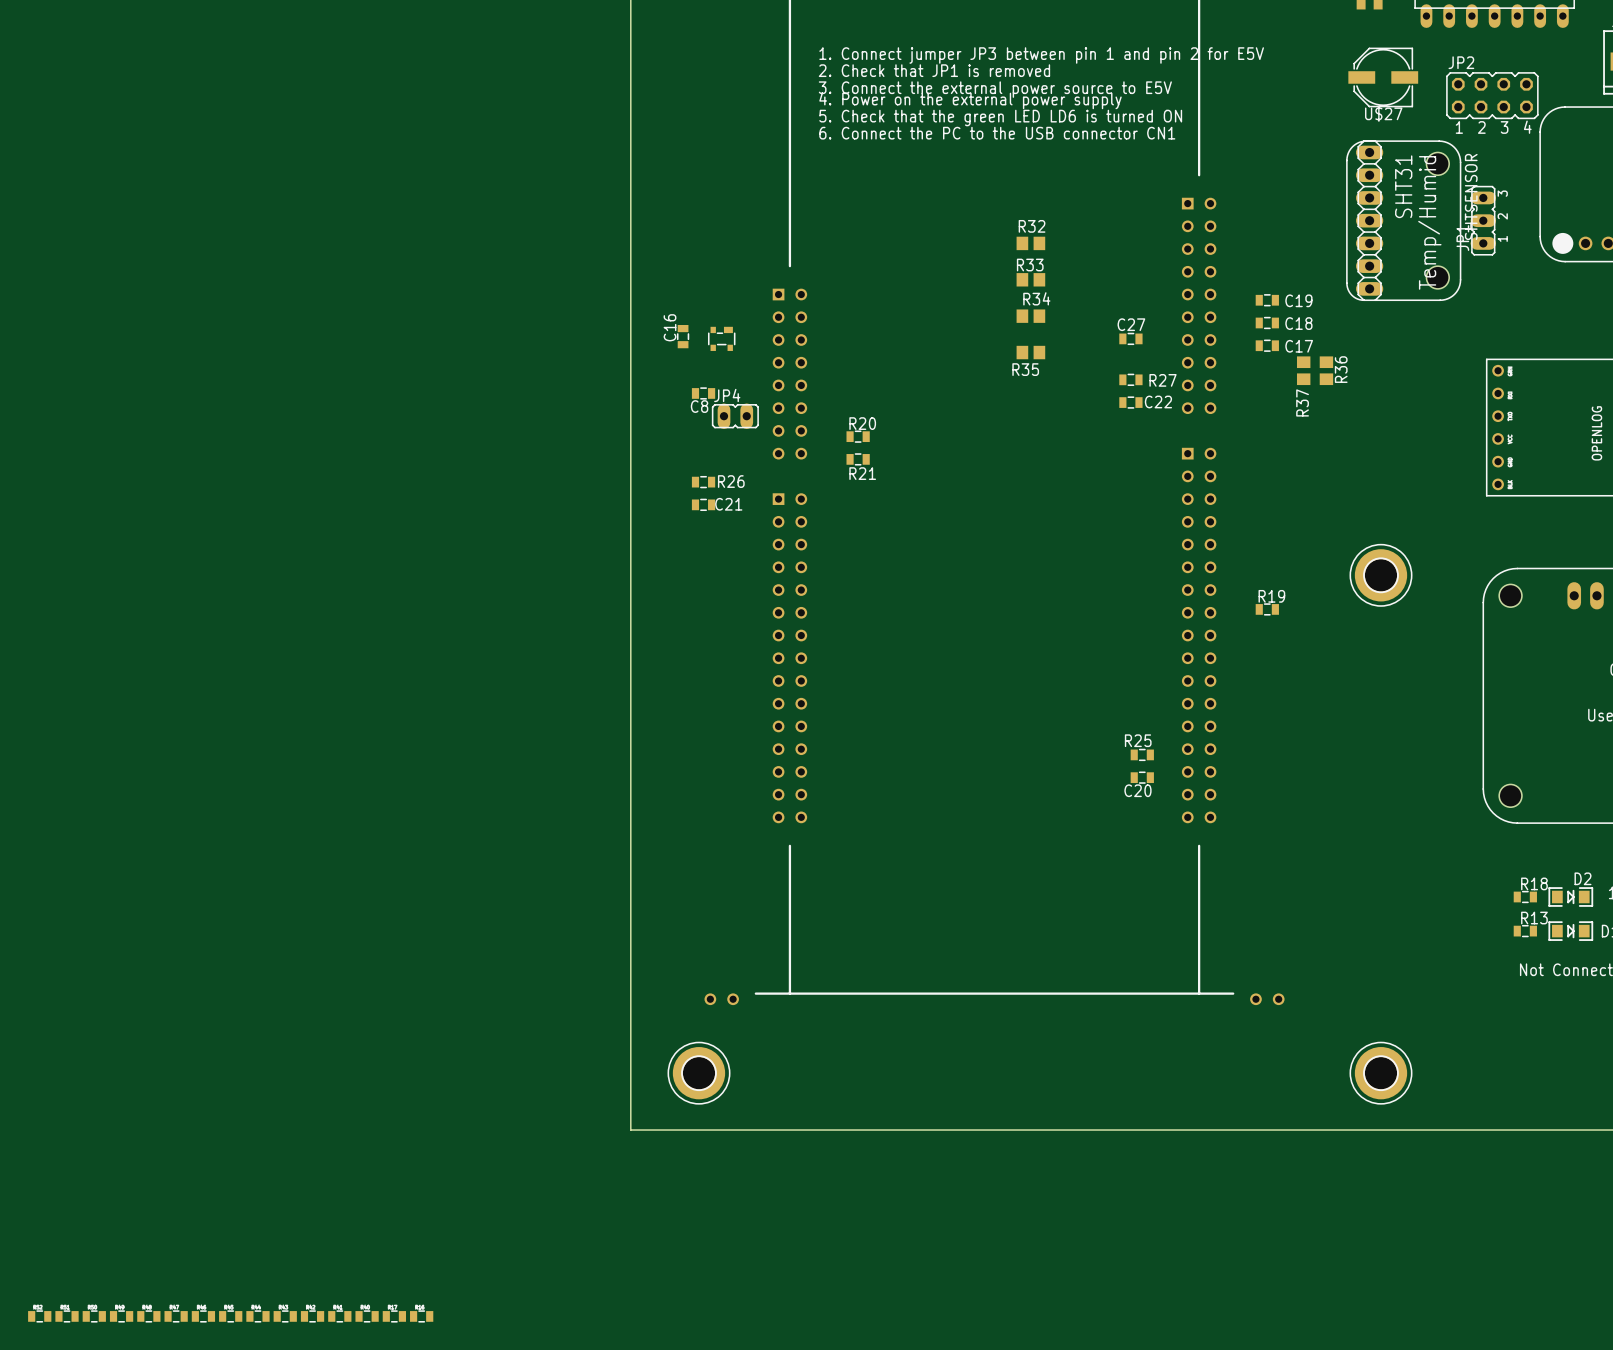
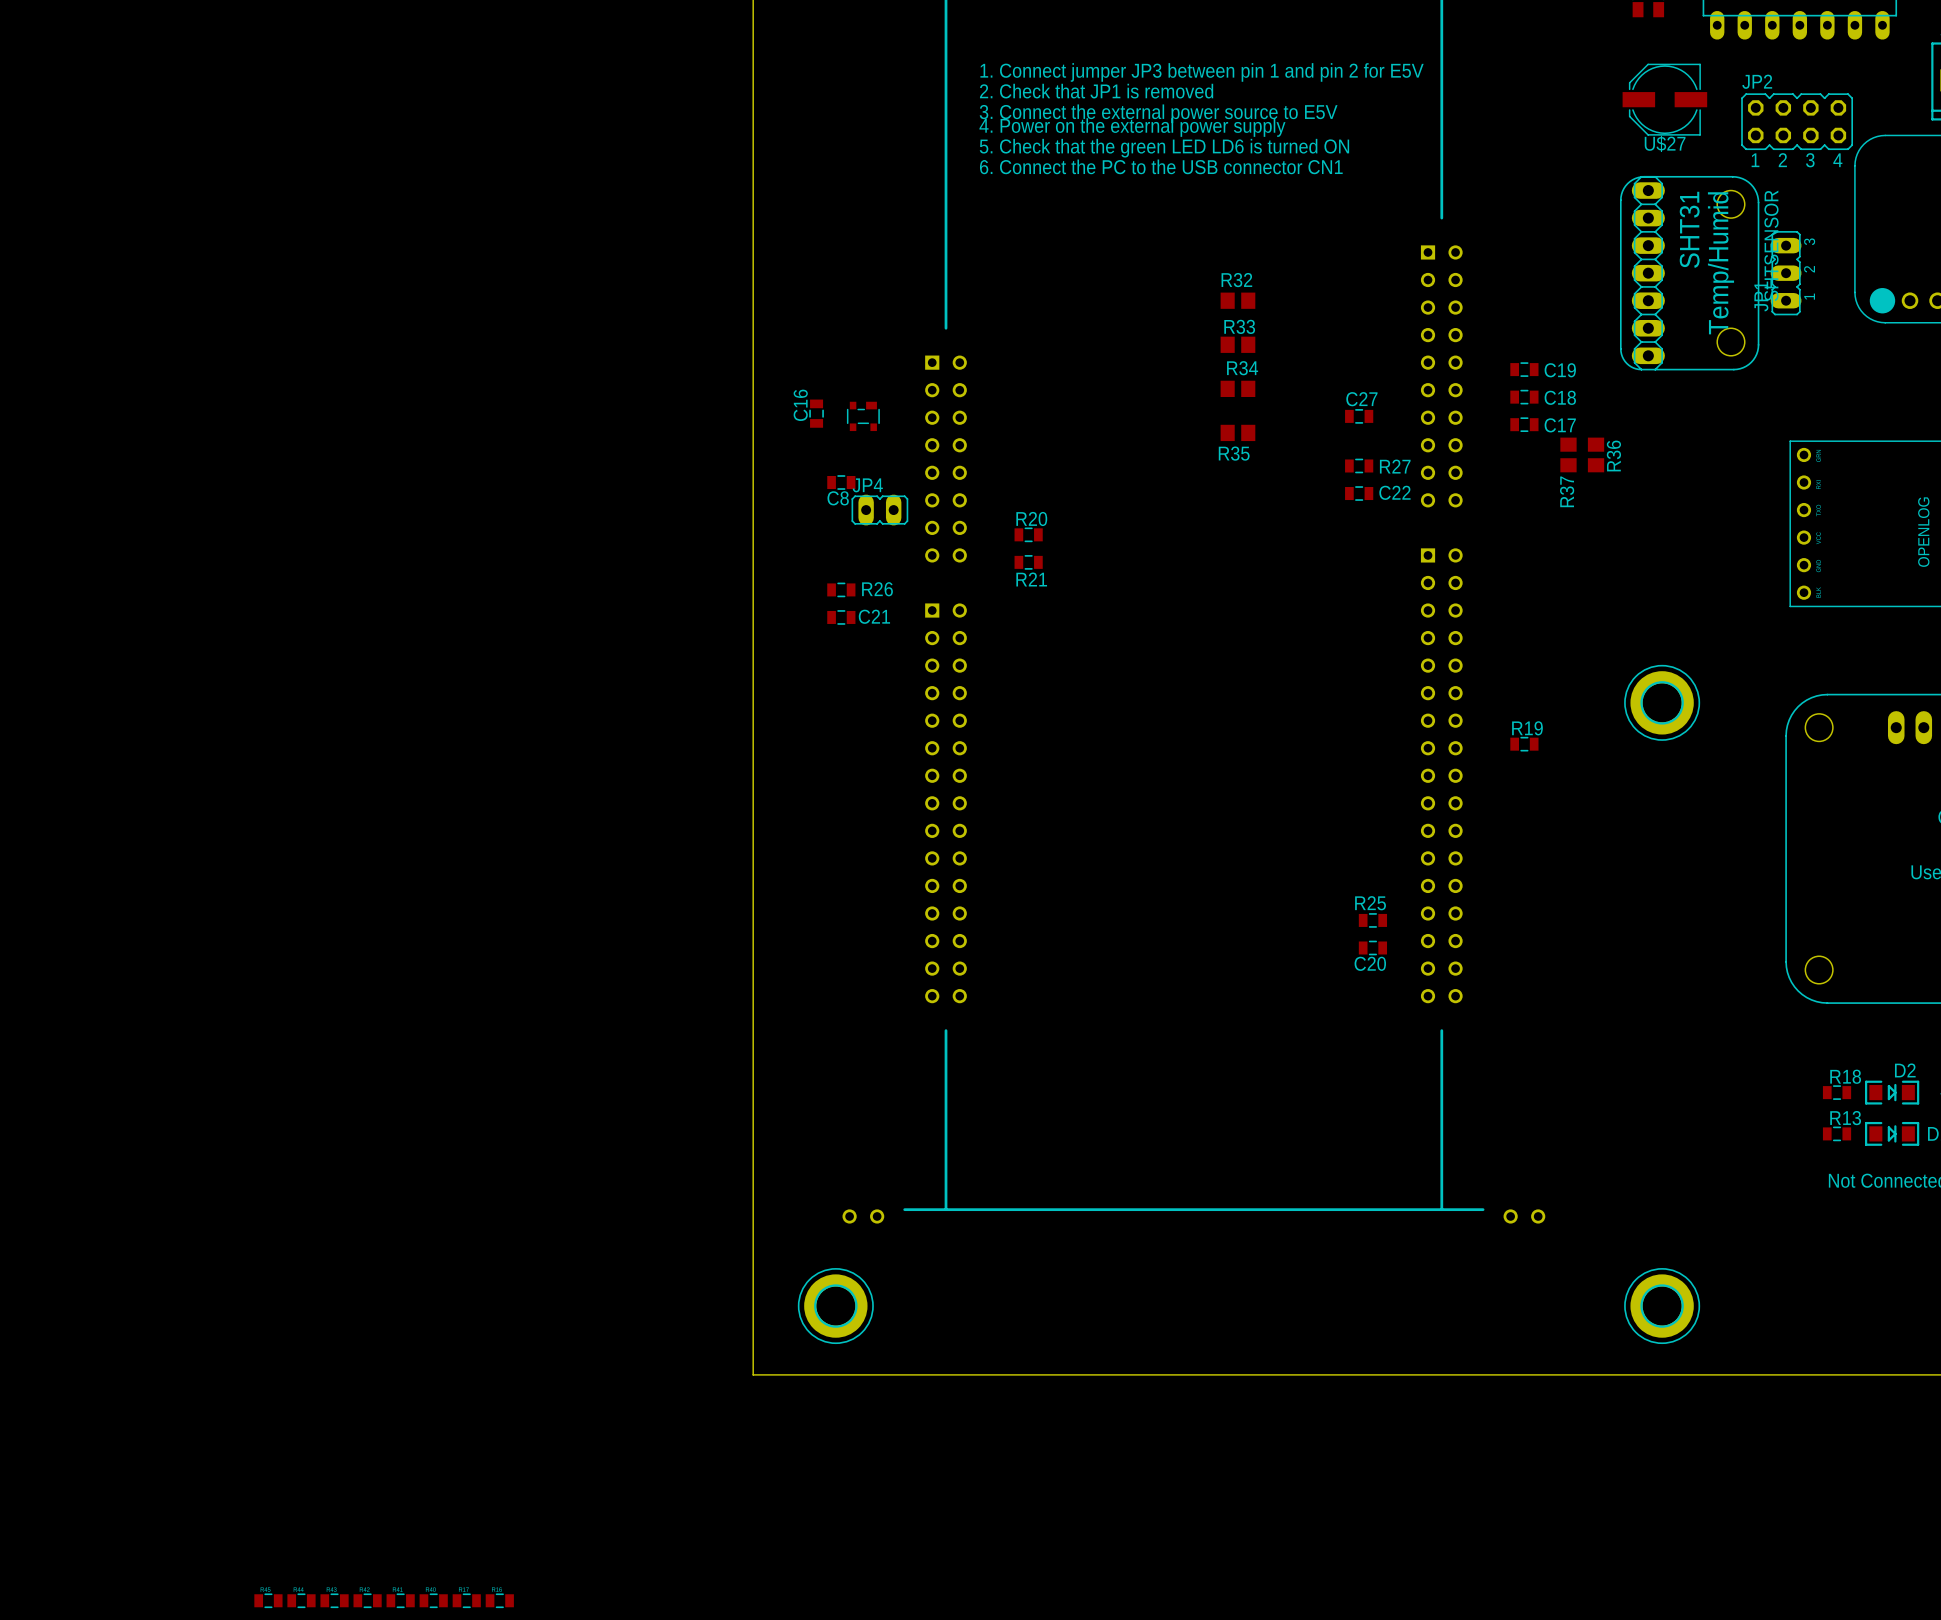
part: (39, 1316) -> none
part: (67, 1316) -> none
part: (94, 1316) -> none
part: (121, 1316) -> none
part: (148, 1316) -> none
part: (176, 1316) -> none
part: (203, 1316) -> none

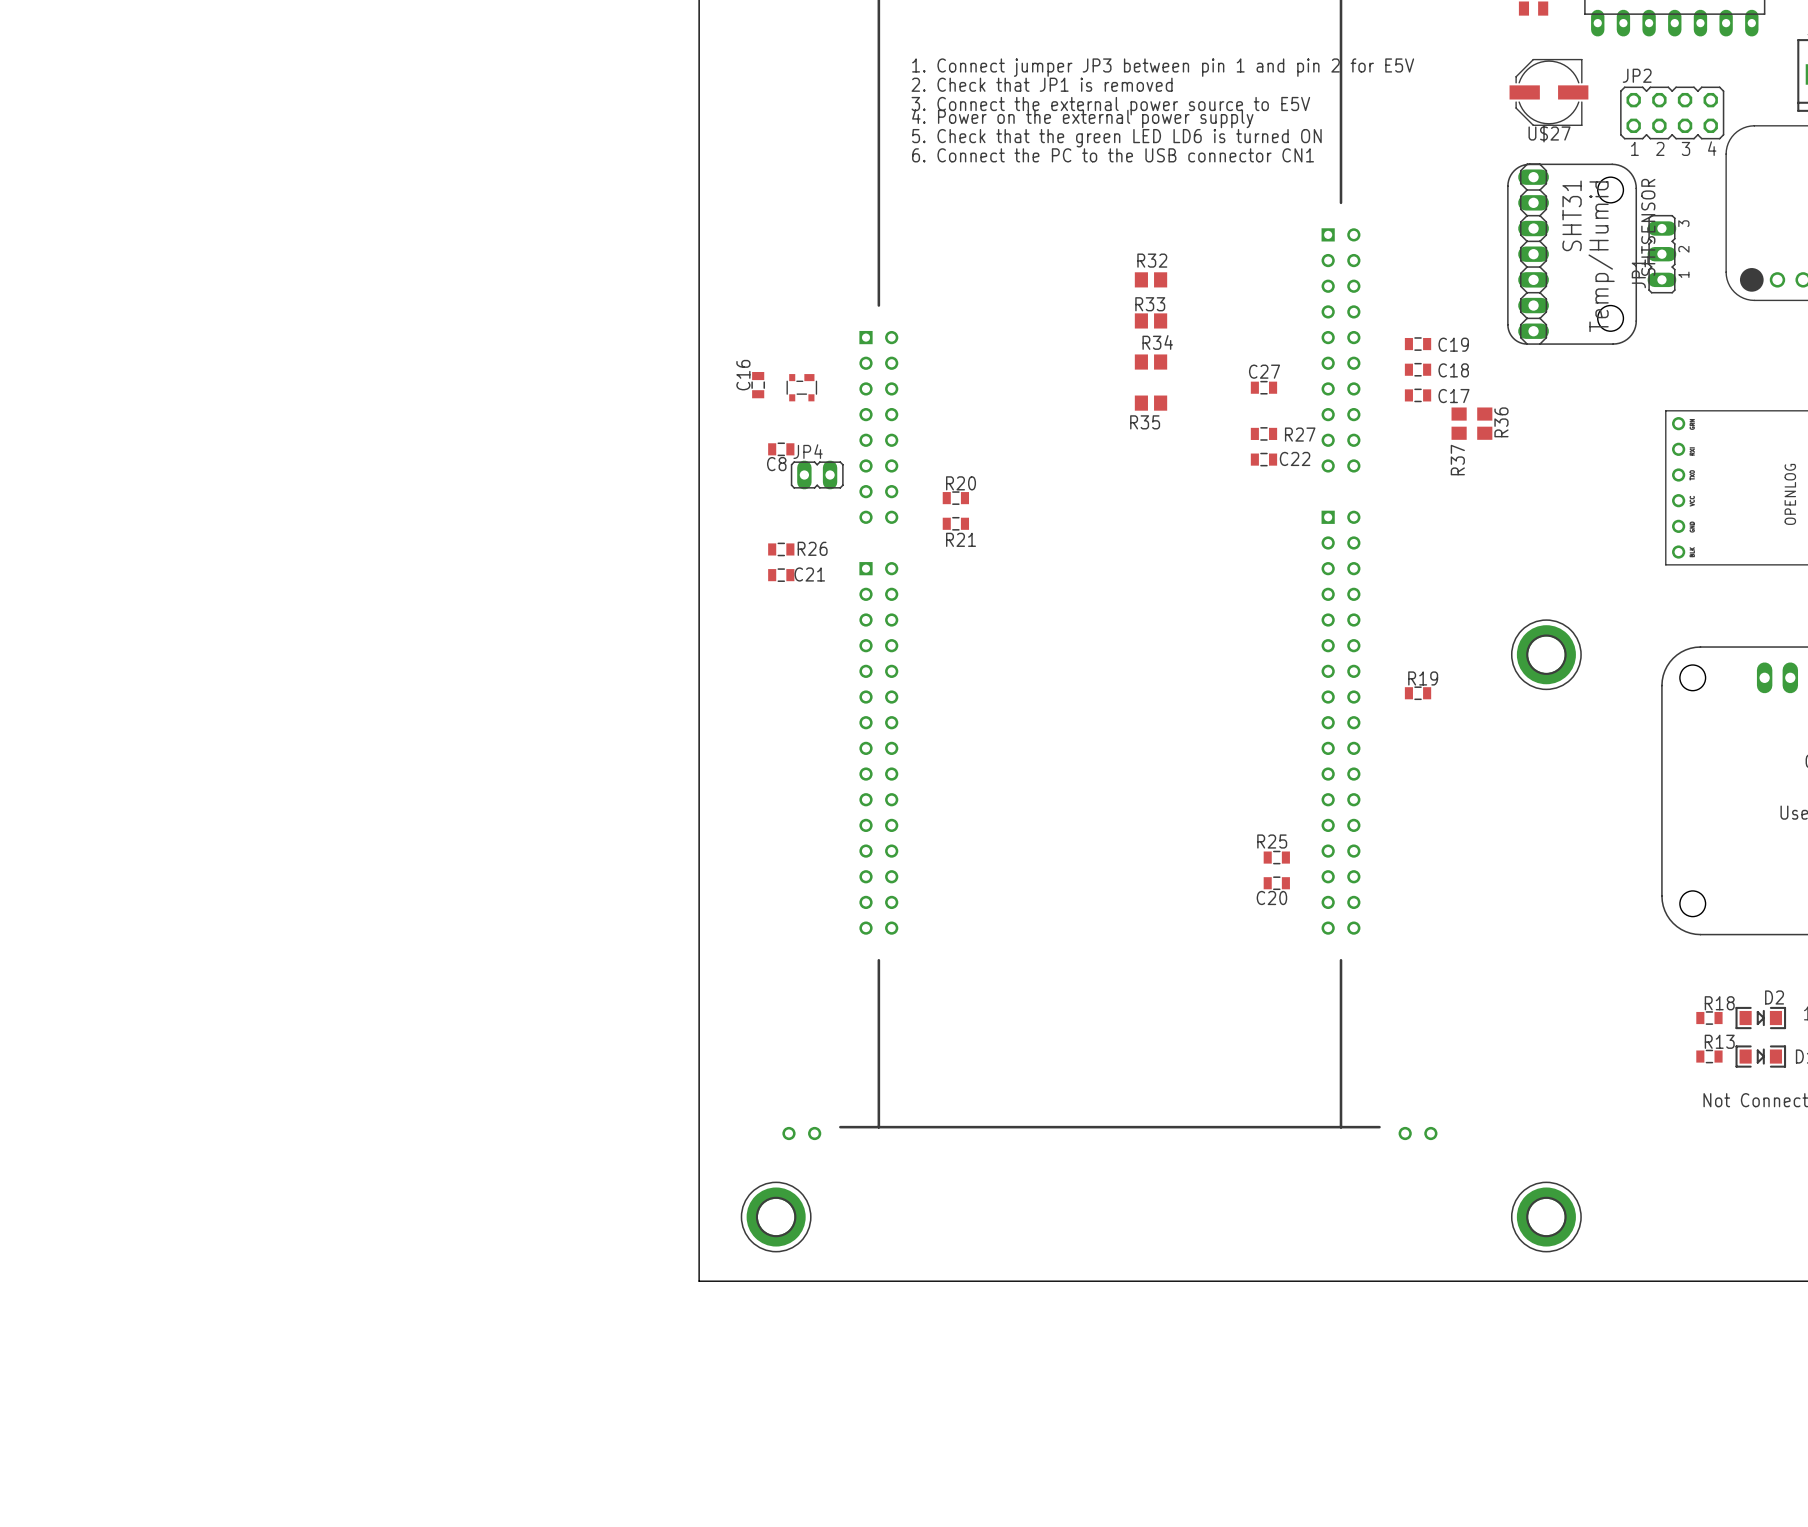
part: (268, 1600) -> none
part: (301, 1600) -> none
part: (334, 1600) -> none
part: (367, 1600) -> none
part: (400, 1600) -> none
part: (433, 1600) -> none
part: (466, 1600) -> none
part: (499, 1600) -> none

